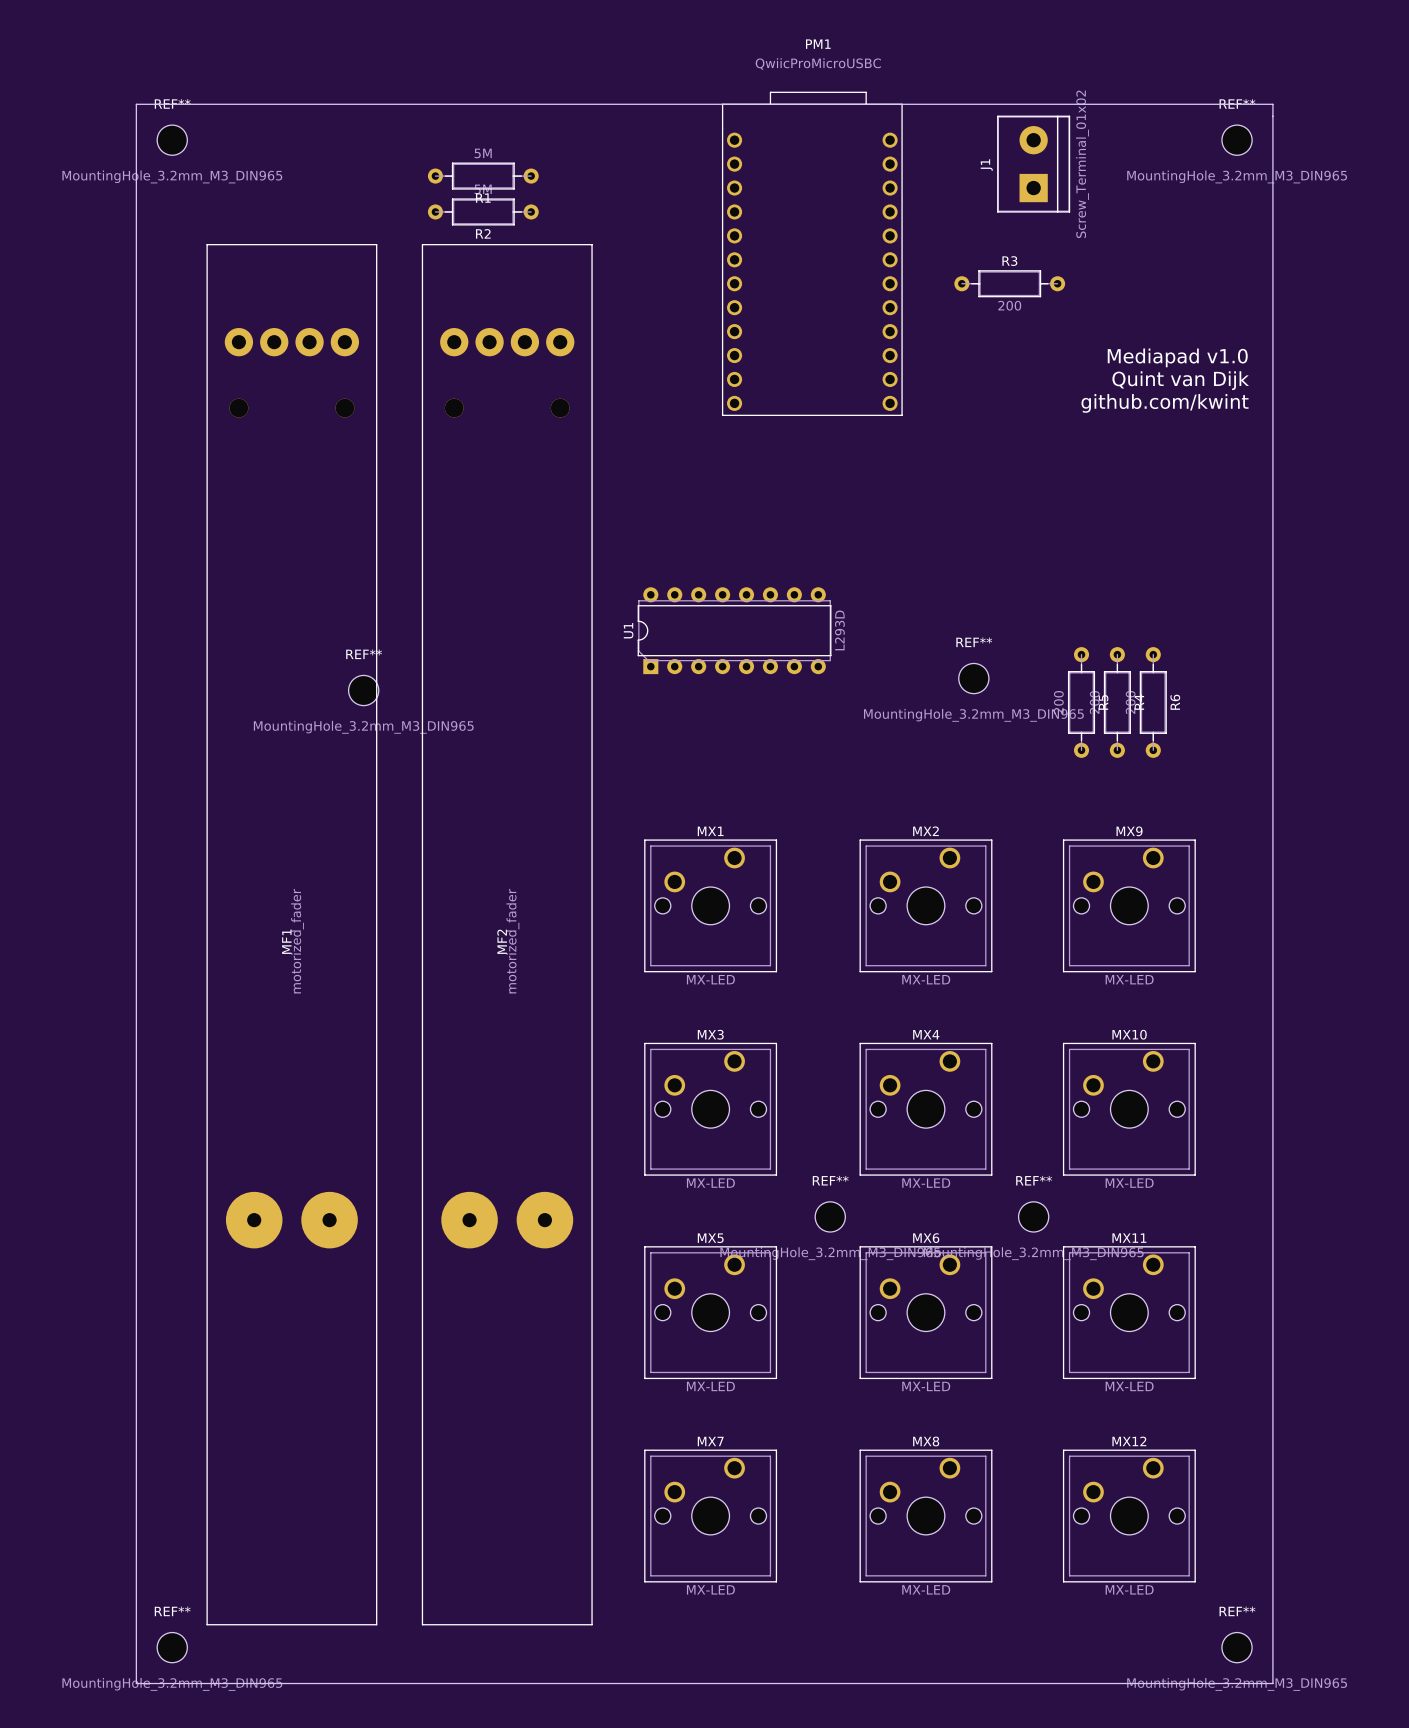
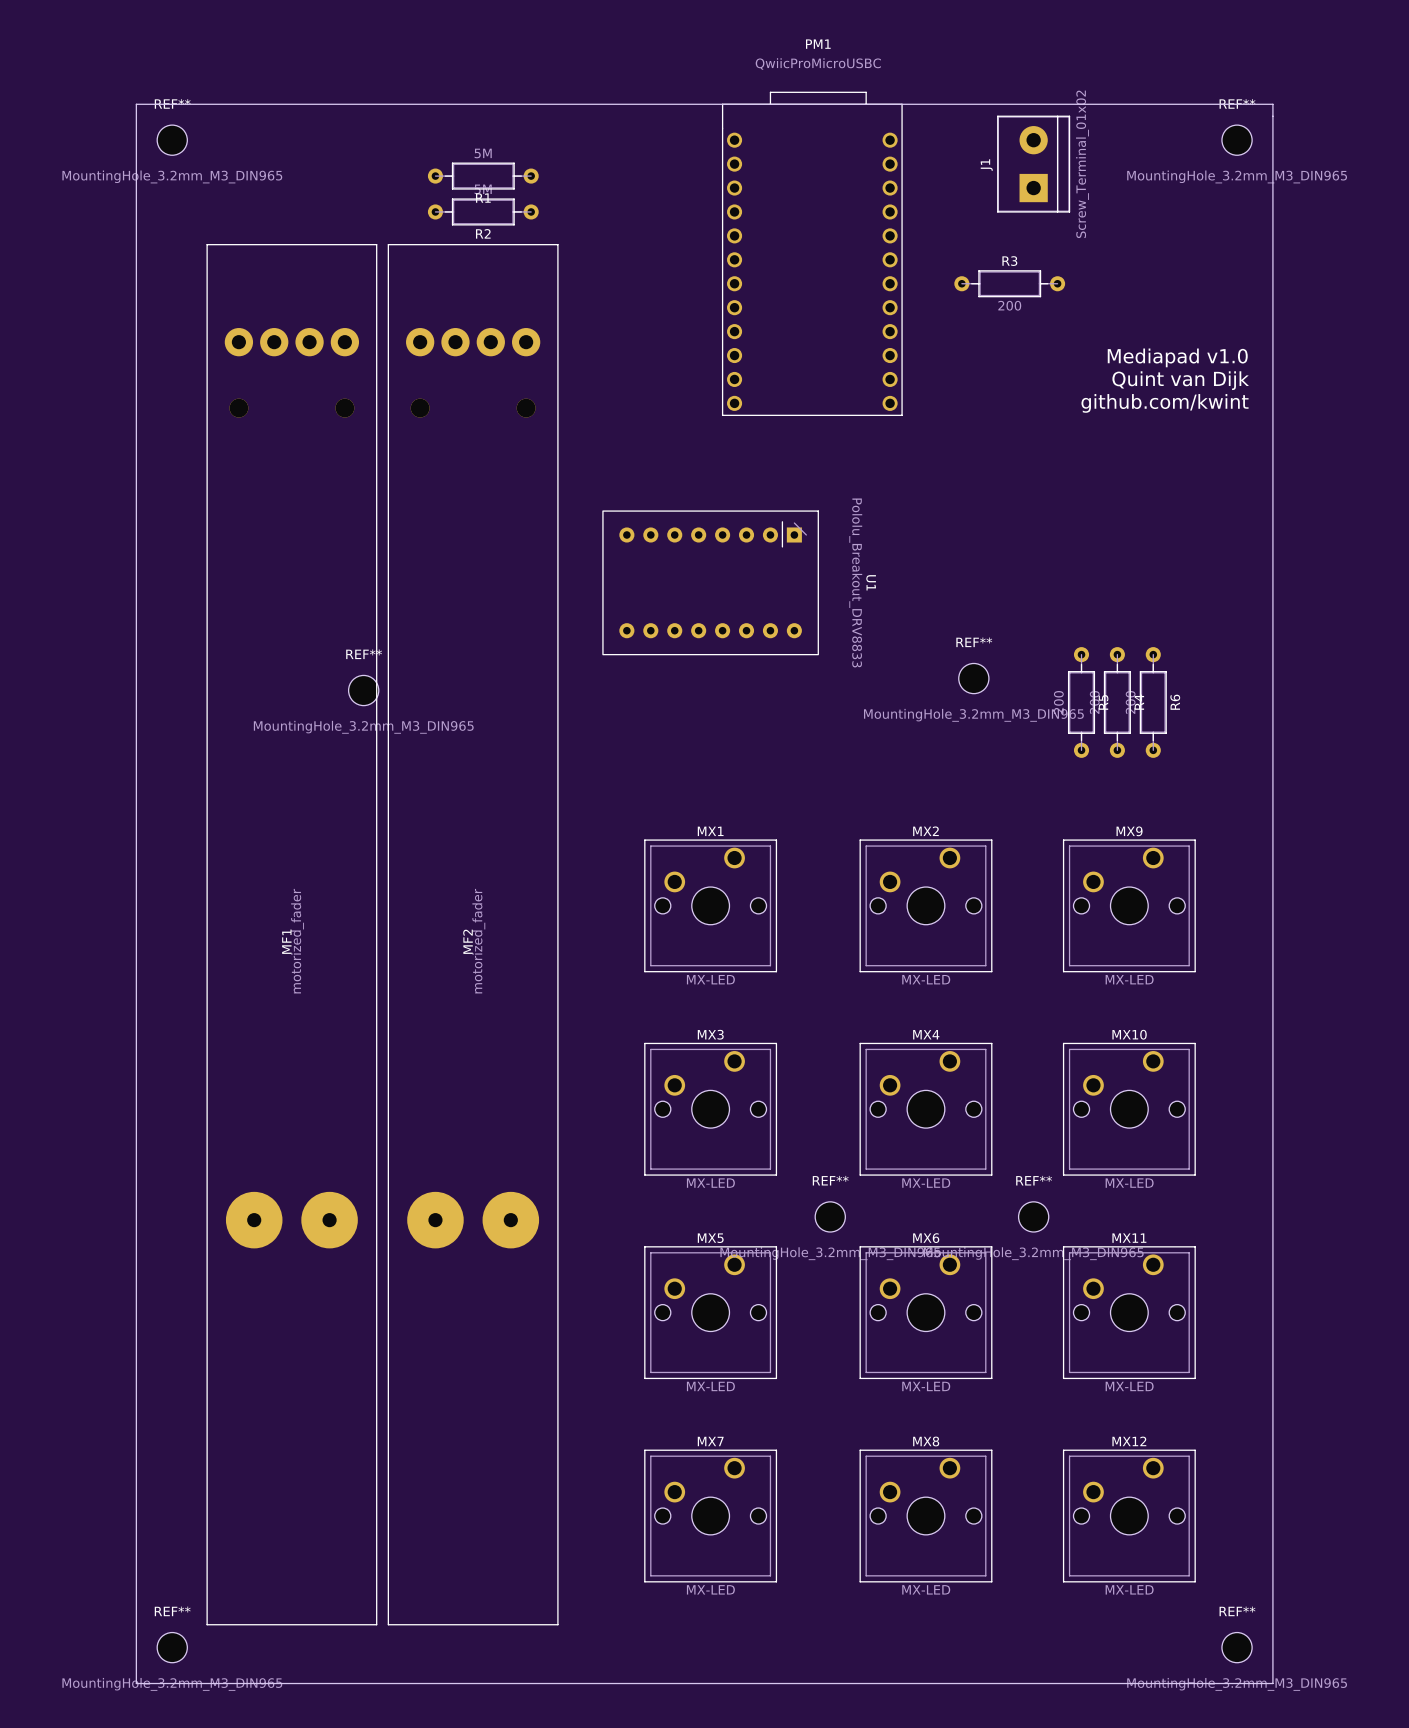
U1 footprint: [637, 587, 832, 675] -> [602, 510, 819, 656]
U1 name position: U1 (628, 630) -> U1 (871, 582)
U1 value: L293D (839, 630) -> Pololu_Breakout_DRV8833 (855, 582)
MF2 position: (507, 934) -> (473, 934)

